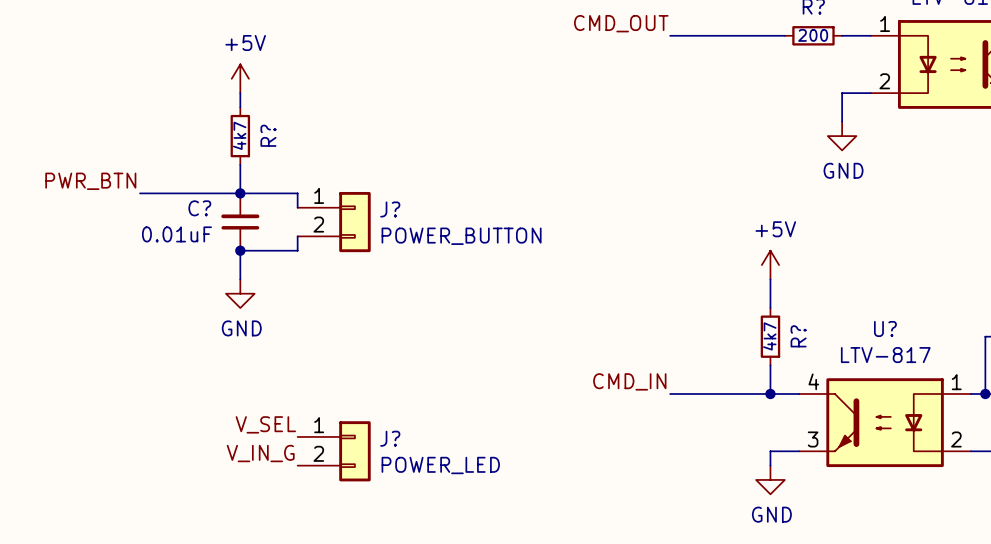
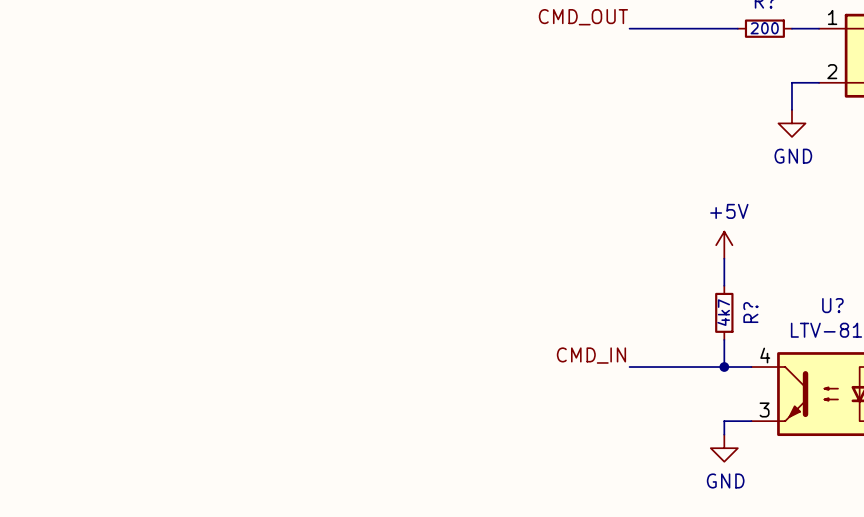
power symbol: +5V (240, 78) -> none
wire: (240, 93) (240, 107) -> none
R?: 4k7 (240, 136) -> none
wire: (240, 164) (240, 193) -> none
label: PWR_BTN (90, 181) -> none
wire: (140, 193) (297, 193) (297, 207) -> none
junction: (240, 193) -> none
C?: 0.01uF (240, 222) -> none
J?: POWER_BUTTON (334, 222) -> none
wire: (297, 236) (297, 250) (240, 250) (240, 279) -> none
junction: (240, 250) -> none
power symbol: GND (240, 293) -> none
label: V_SEL (265, 424) -> none
J?: POWER_LED (334, 451) -> none
label: V_IN_G (260, 453) -> none

